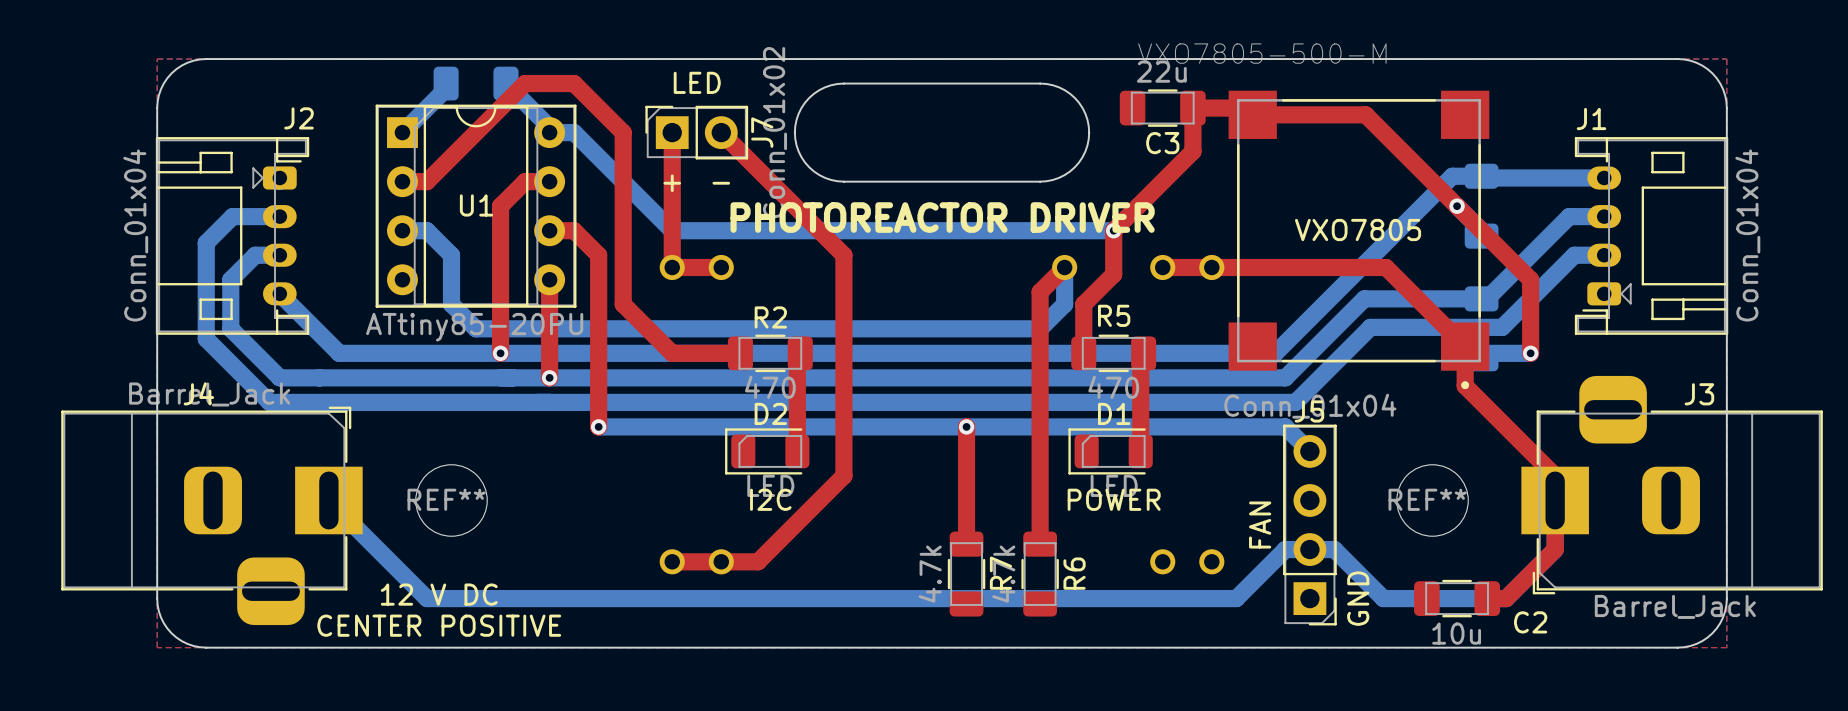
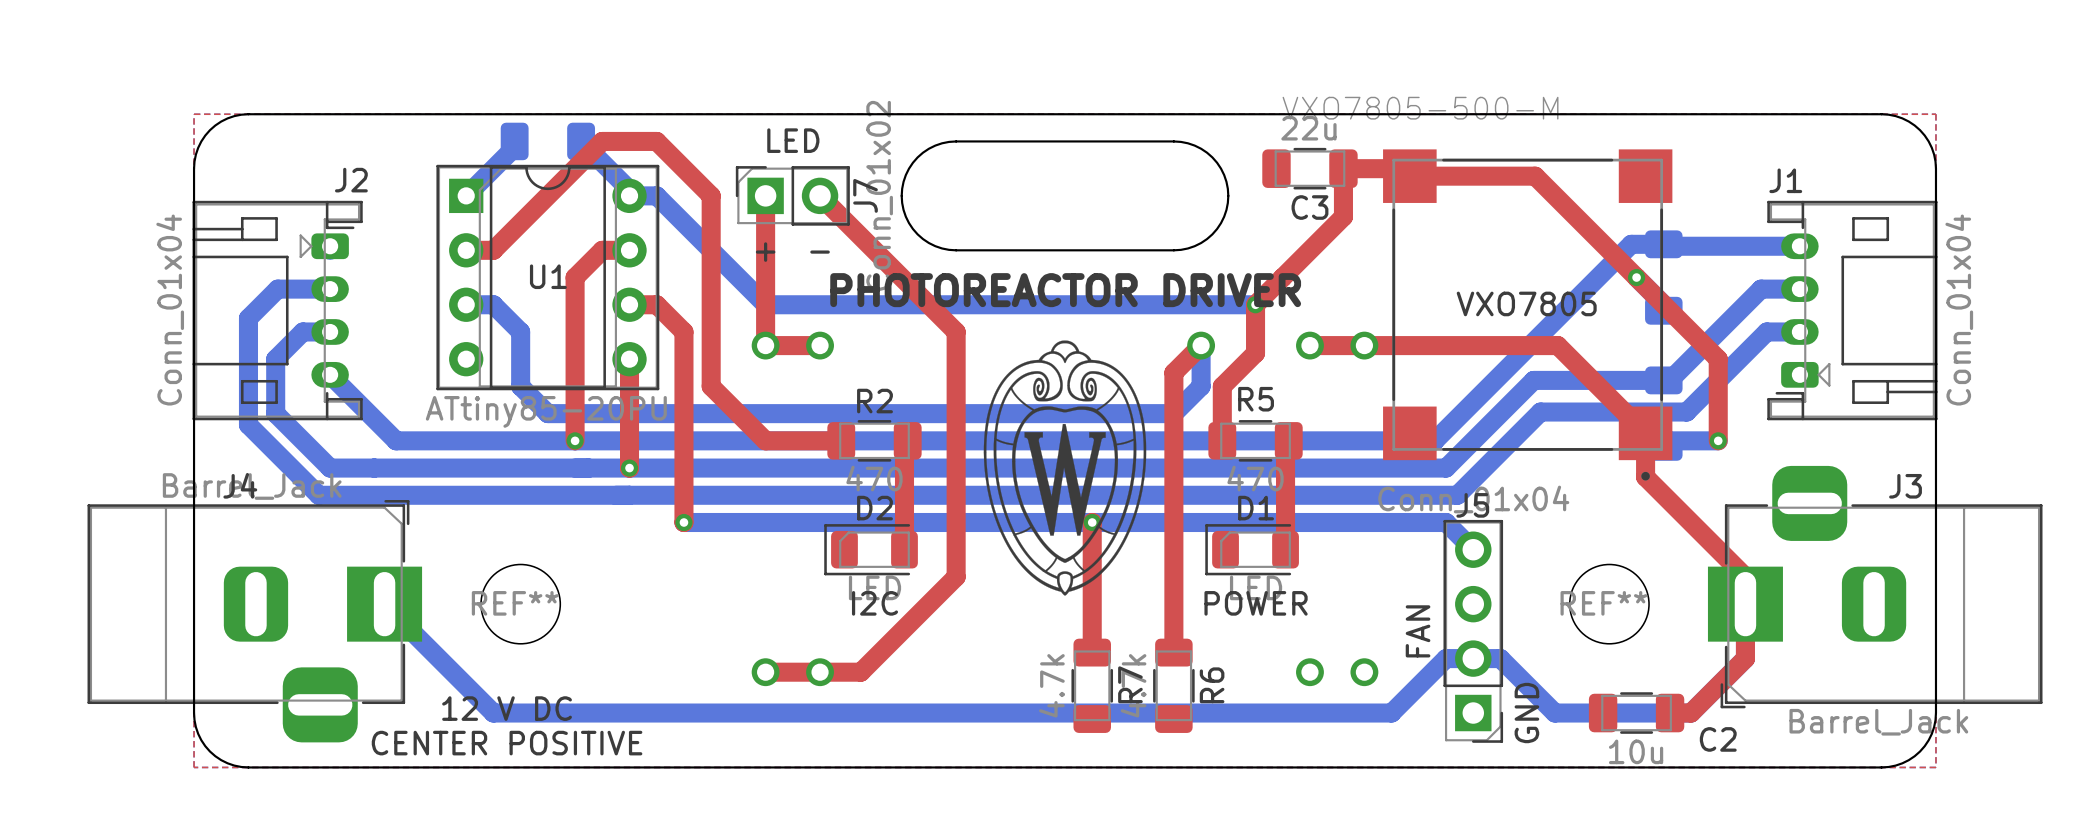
drawing: none -> [983, 340, 1147, 596]

